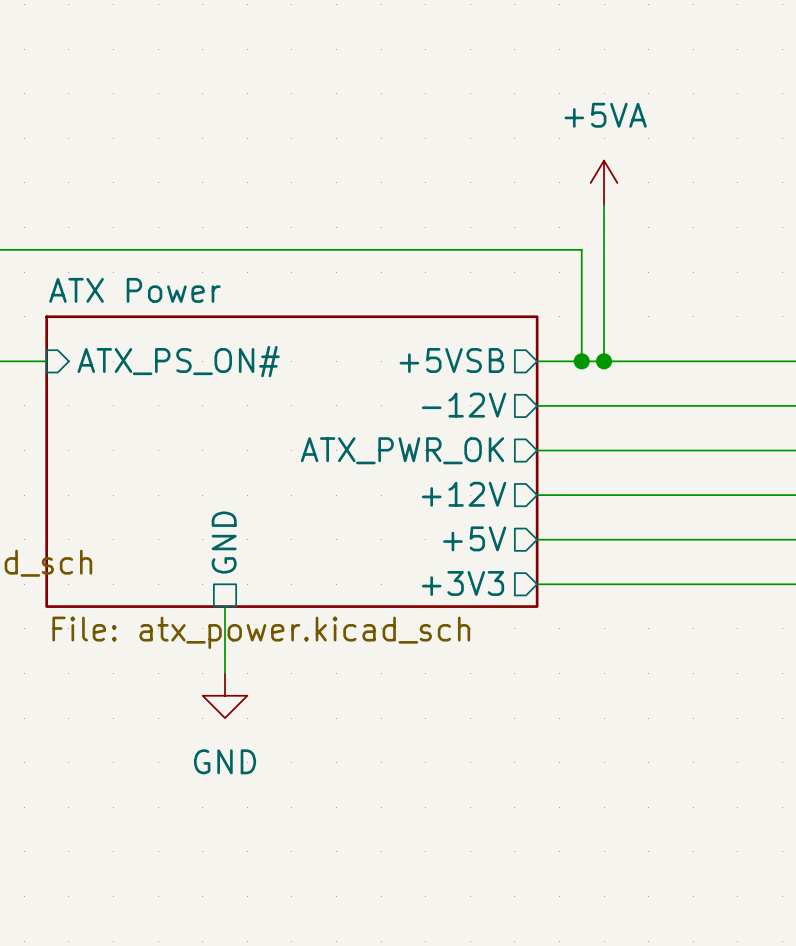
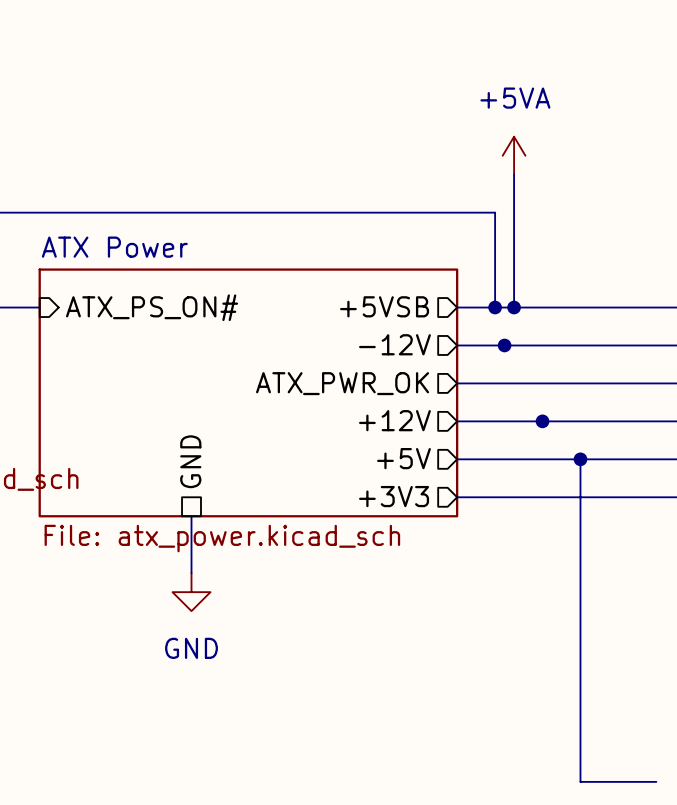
junction: none -> (504, 345)
junction: none -> (542, 421)
wire: none -> (580, 459) (580, 781) (656, 781)
junction: none -> (580, 459)

